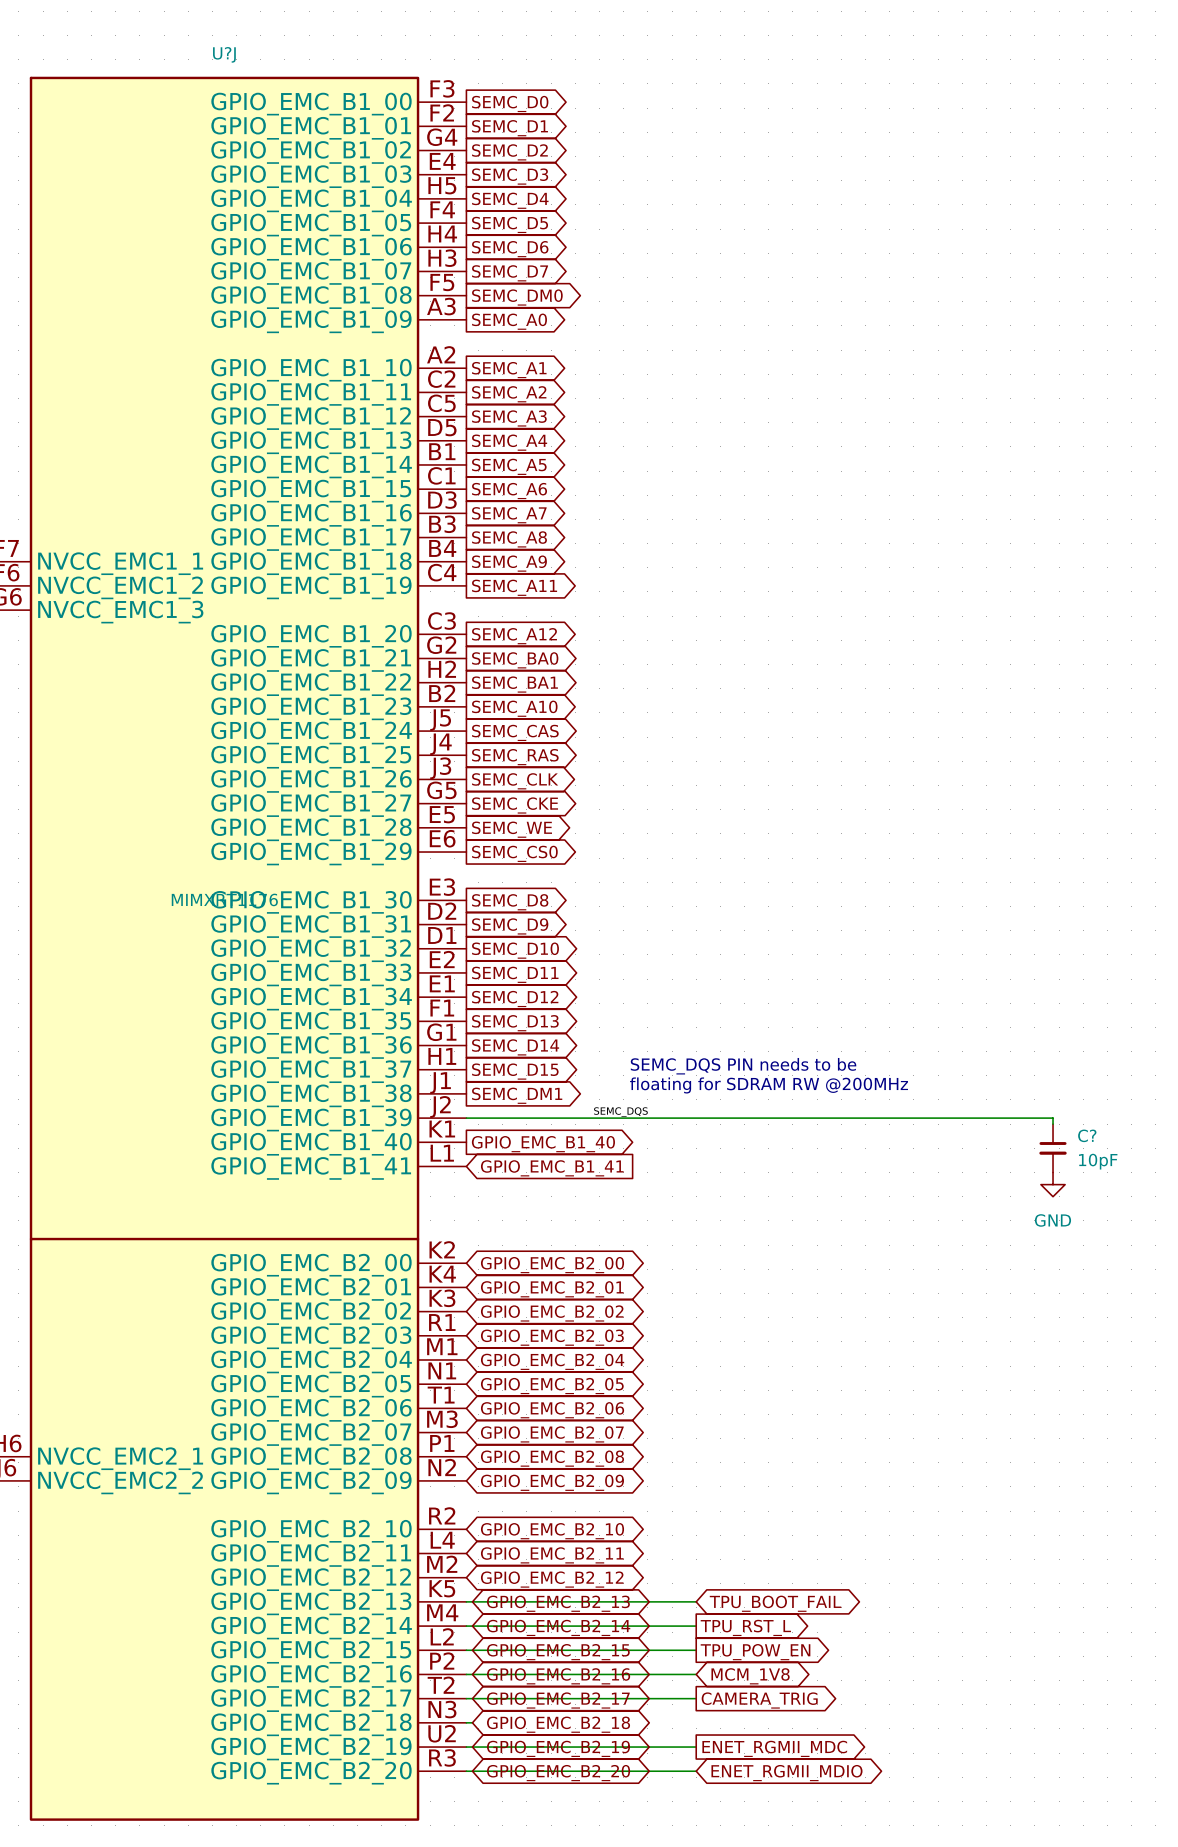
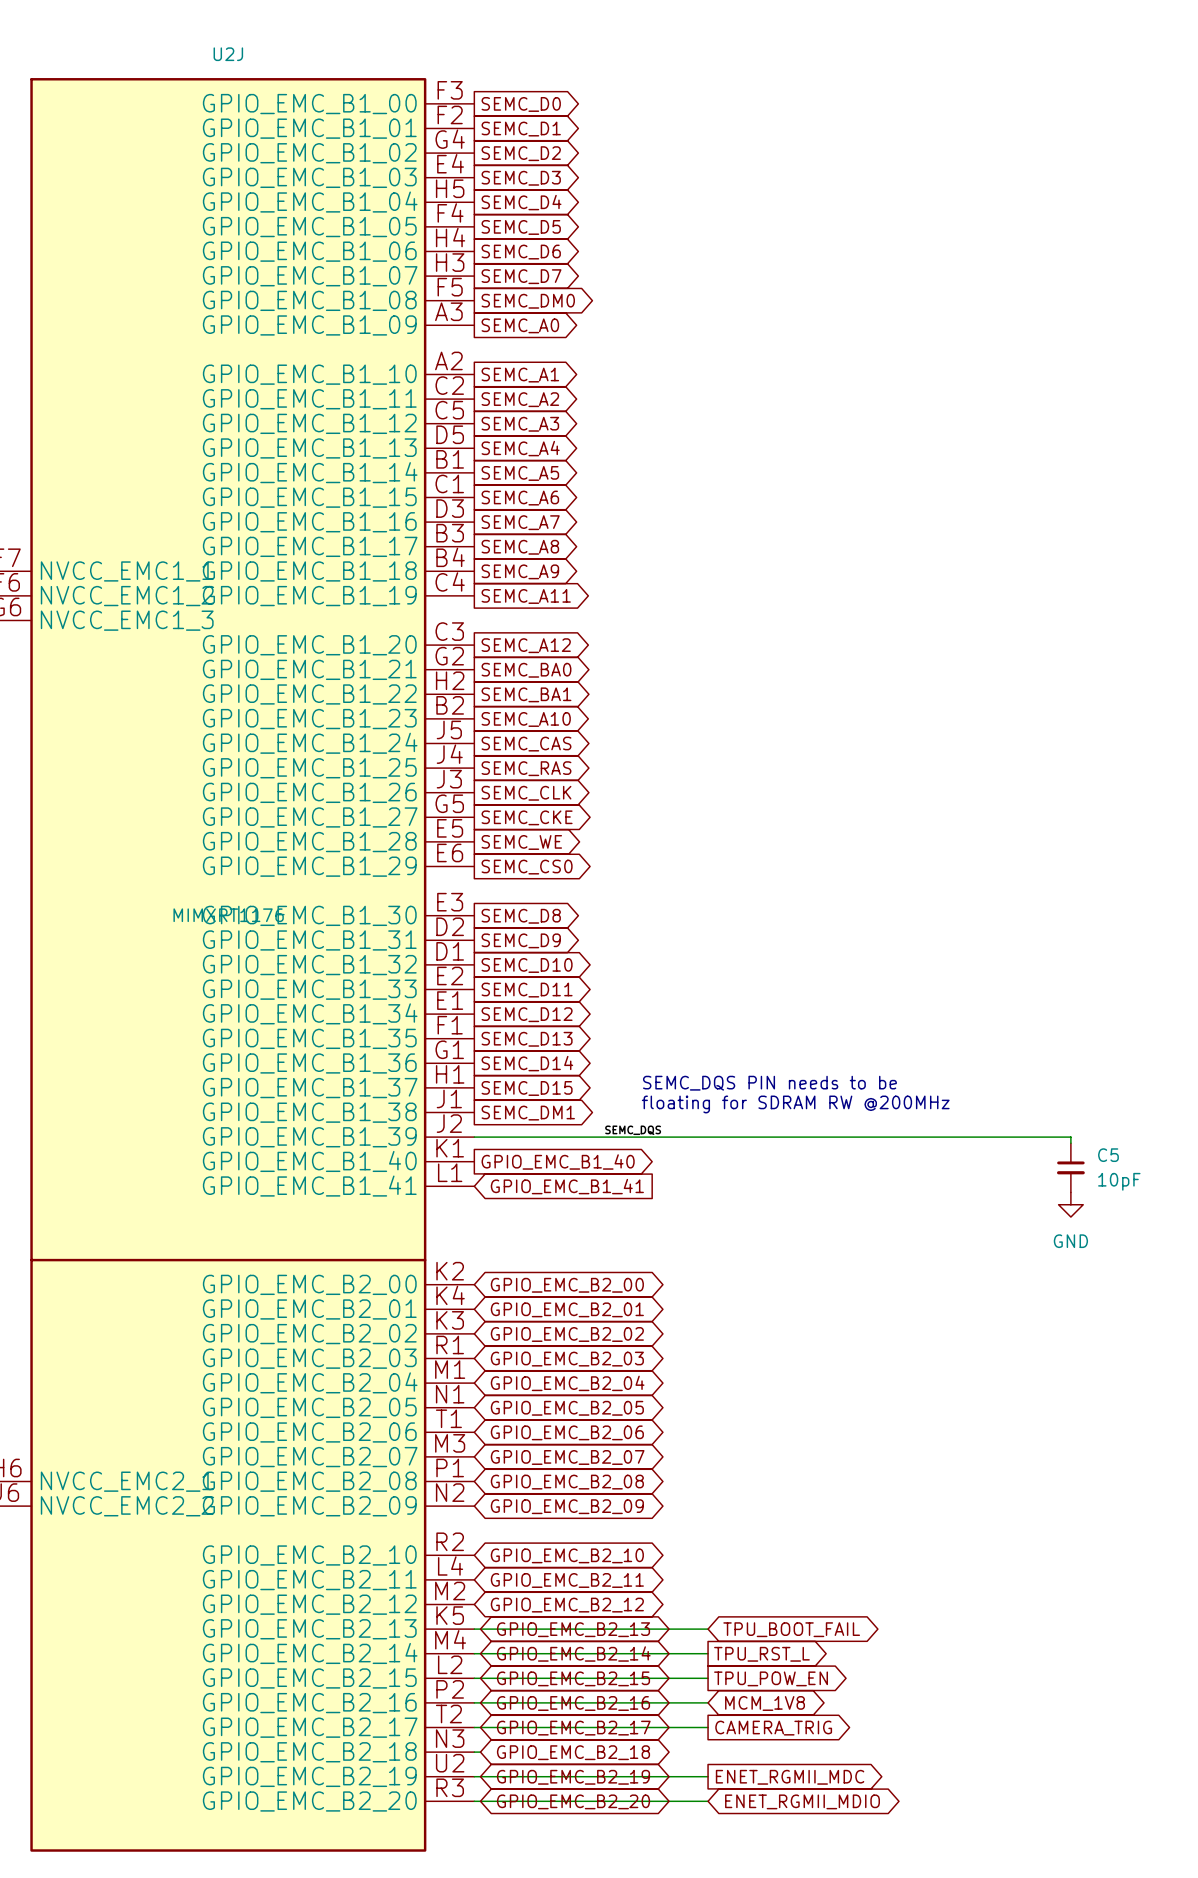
U?J name: U?J (224, 54) -> U2J (228, 54)
C? name: C? (1087, 1135) -> C5 (1108, 1155)

